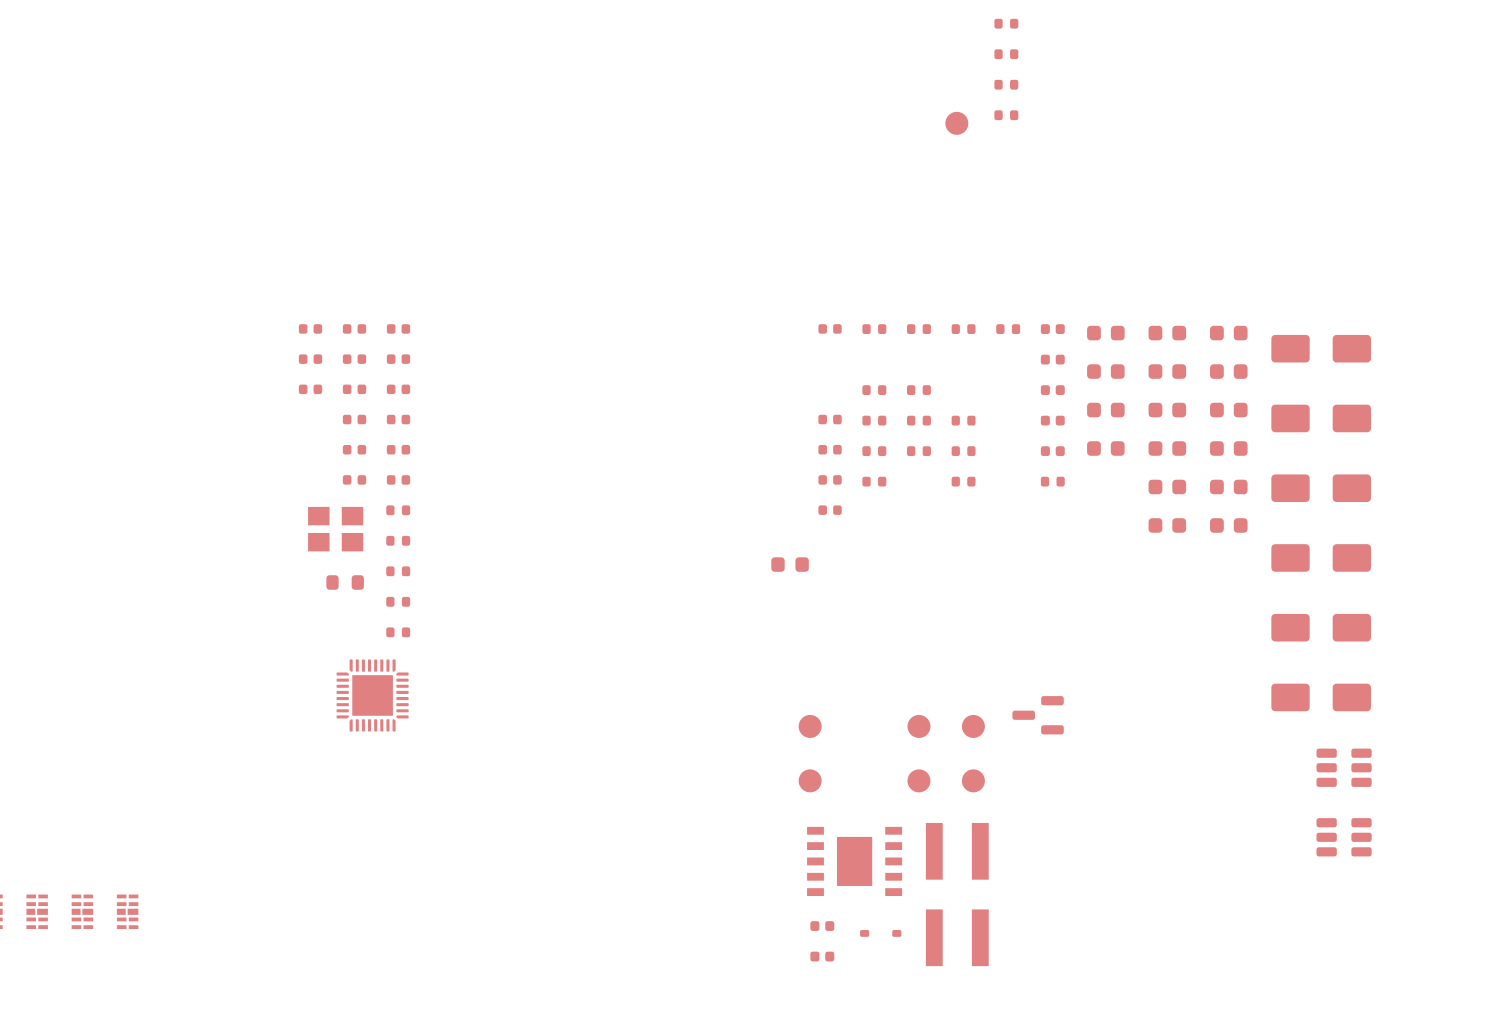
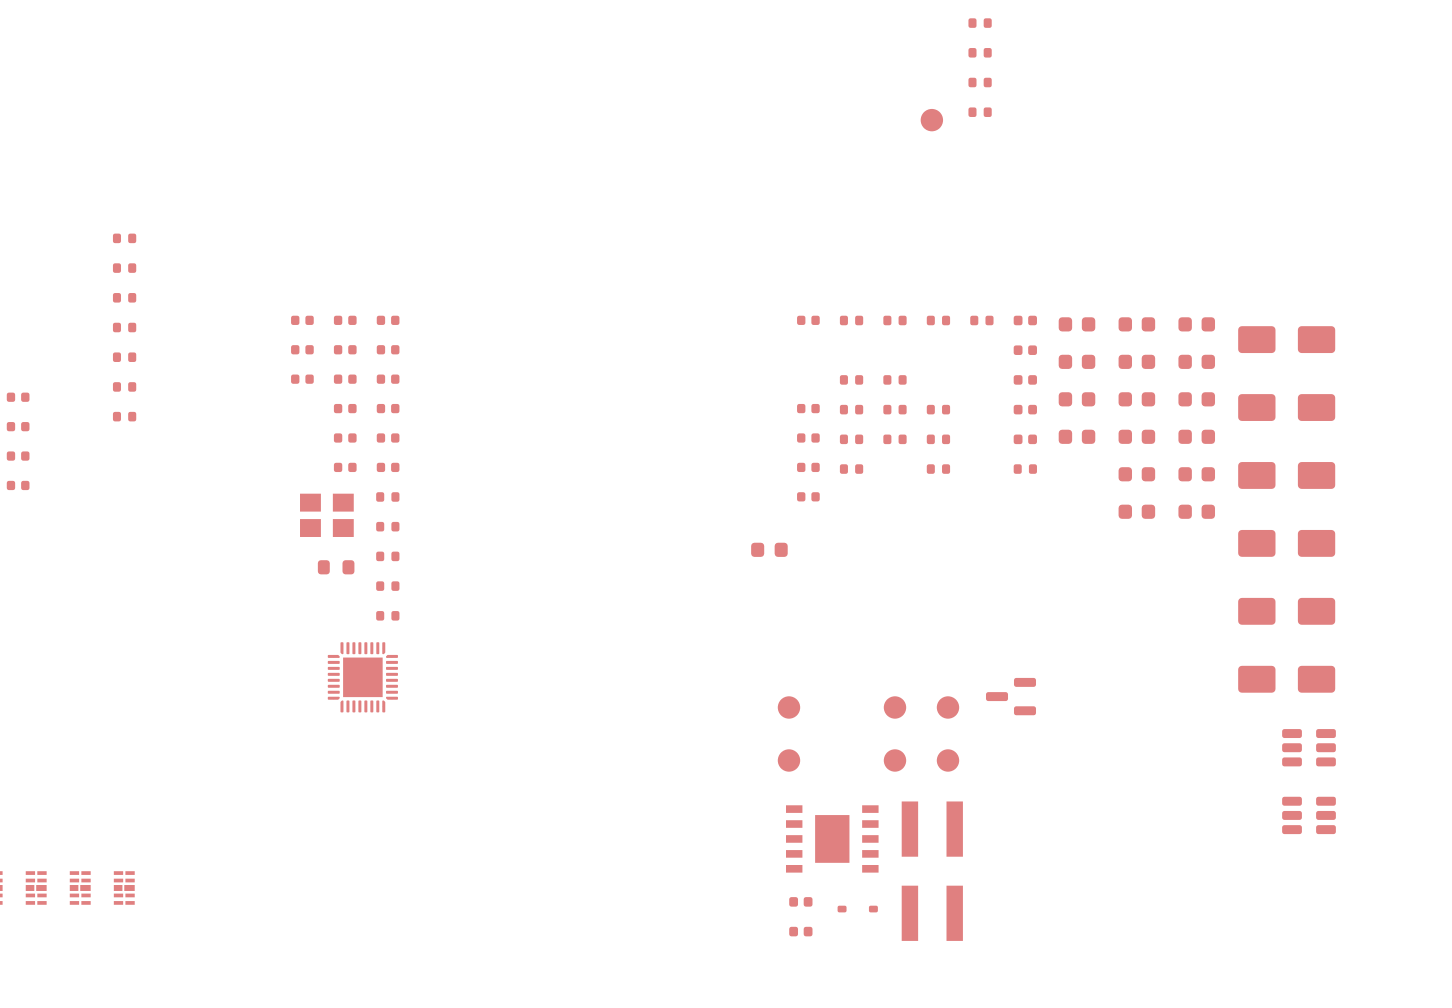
part: none -> (124, 238)
part: none -> (124, 268)
part: none -> (124, 297)
part: none -> (124, 327)
part: none -> (124, 357)
part: none -> (124, 386)
part: none -> (18, 397)
part: none -> (124, 416)
part: none -> (18, 426)
part: none -> (18, 456)
part: none -> (18, 485)

